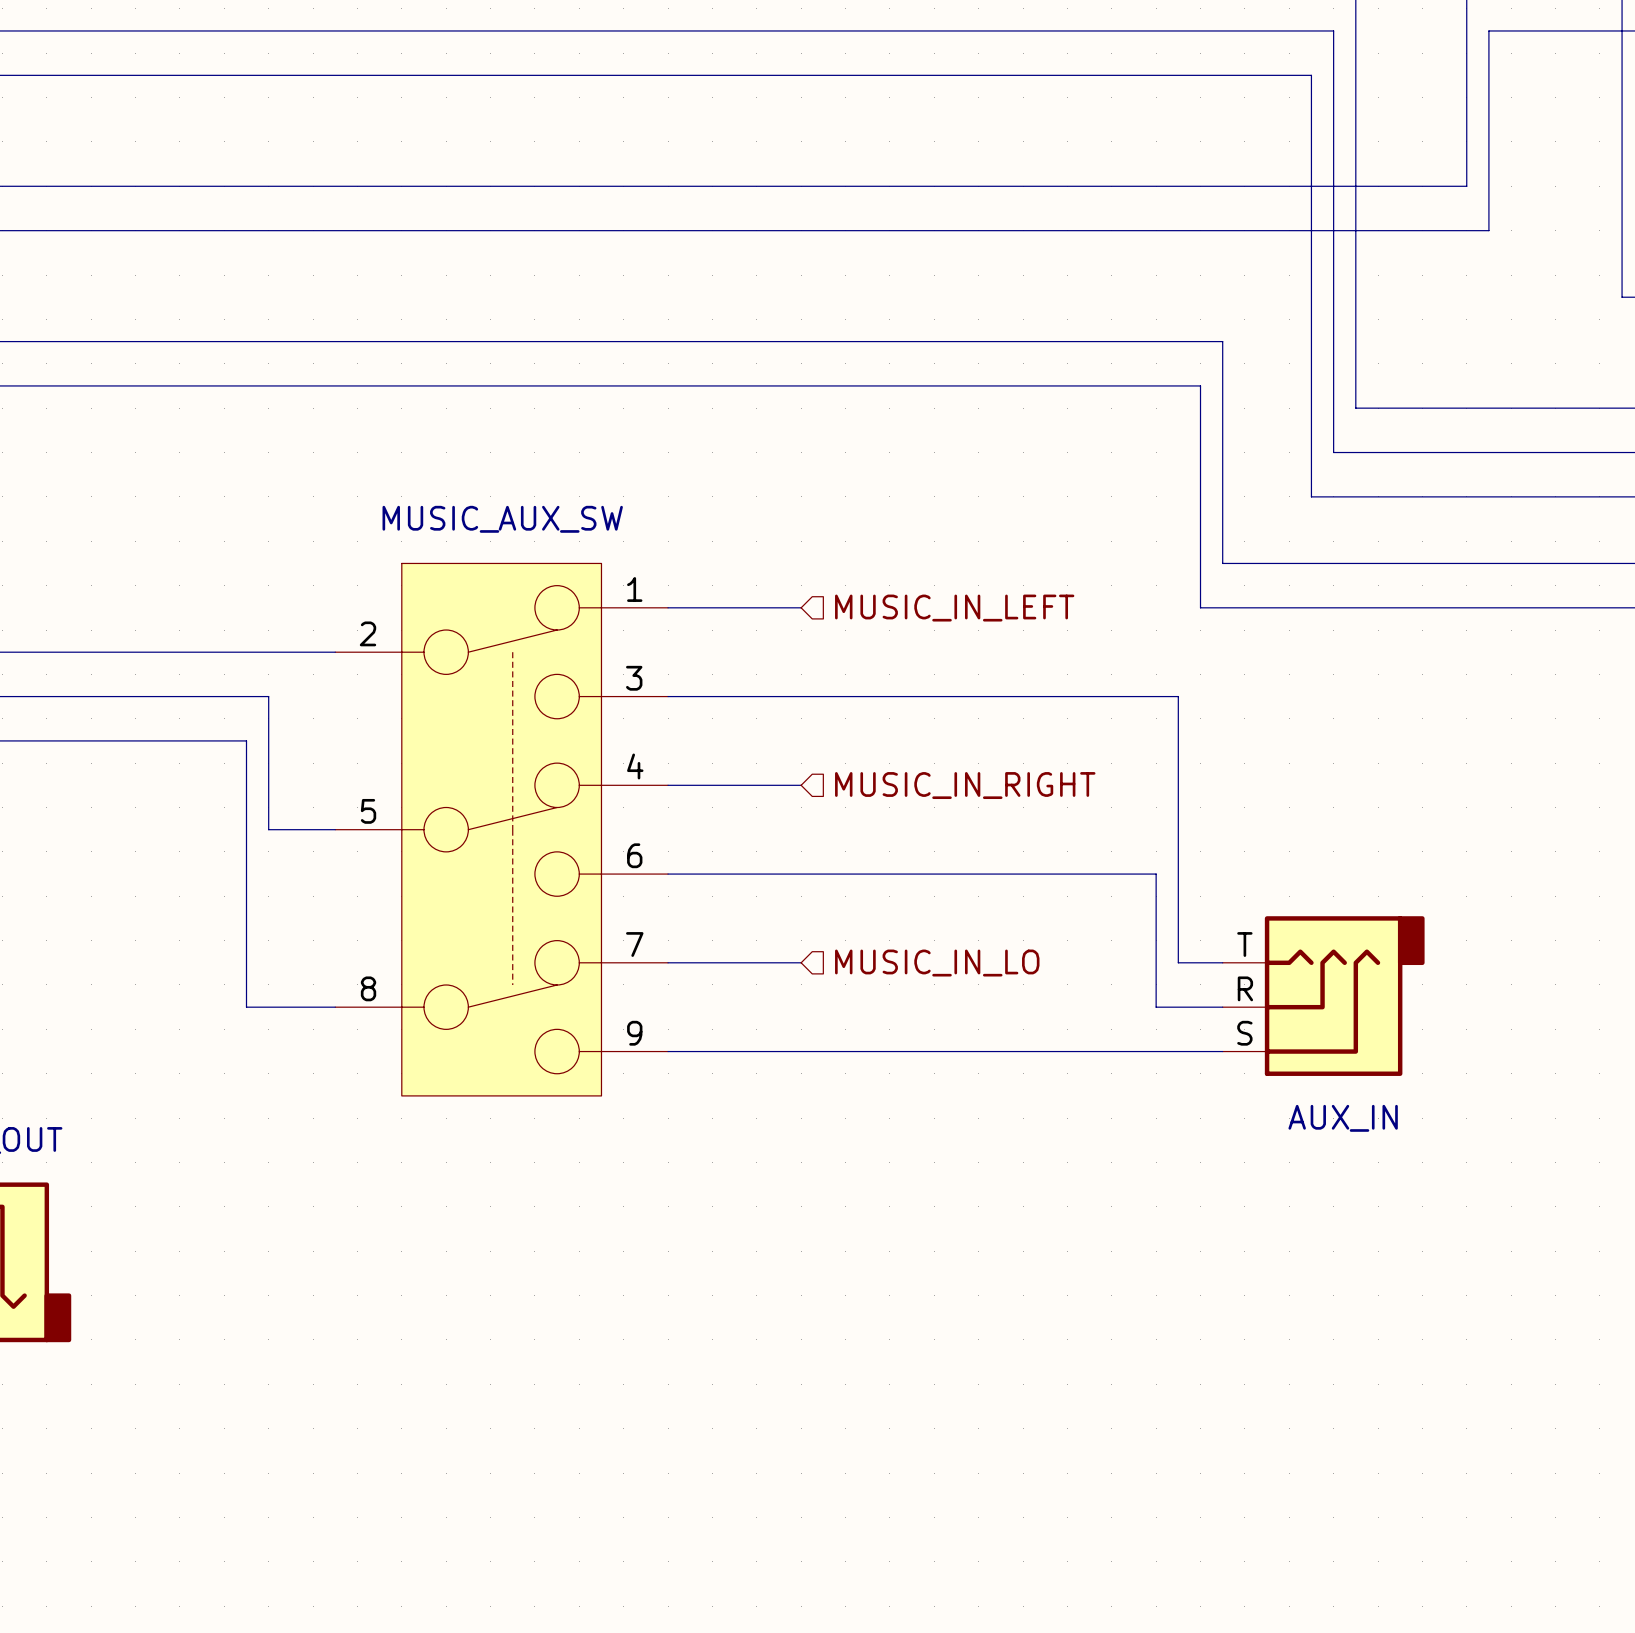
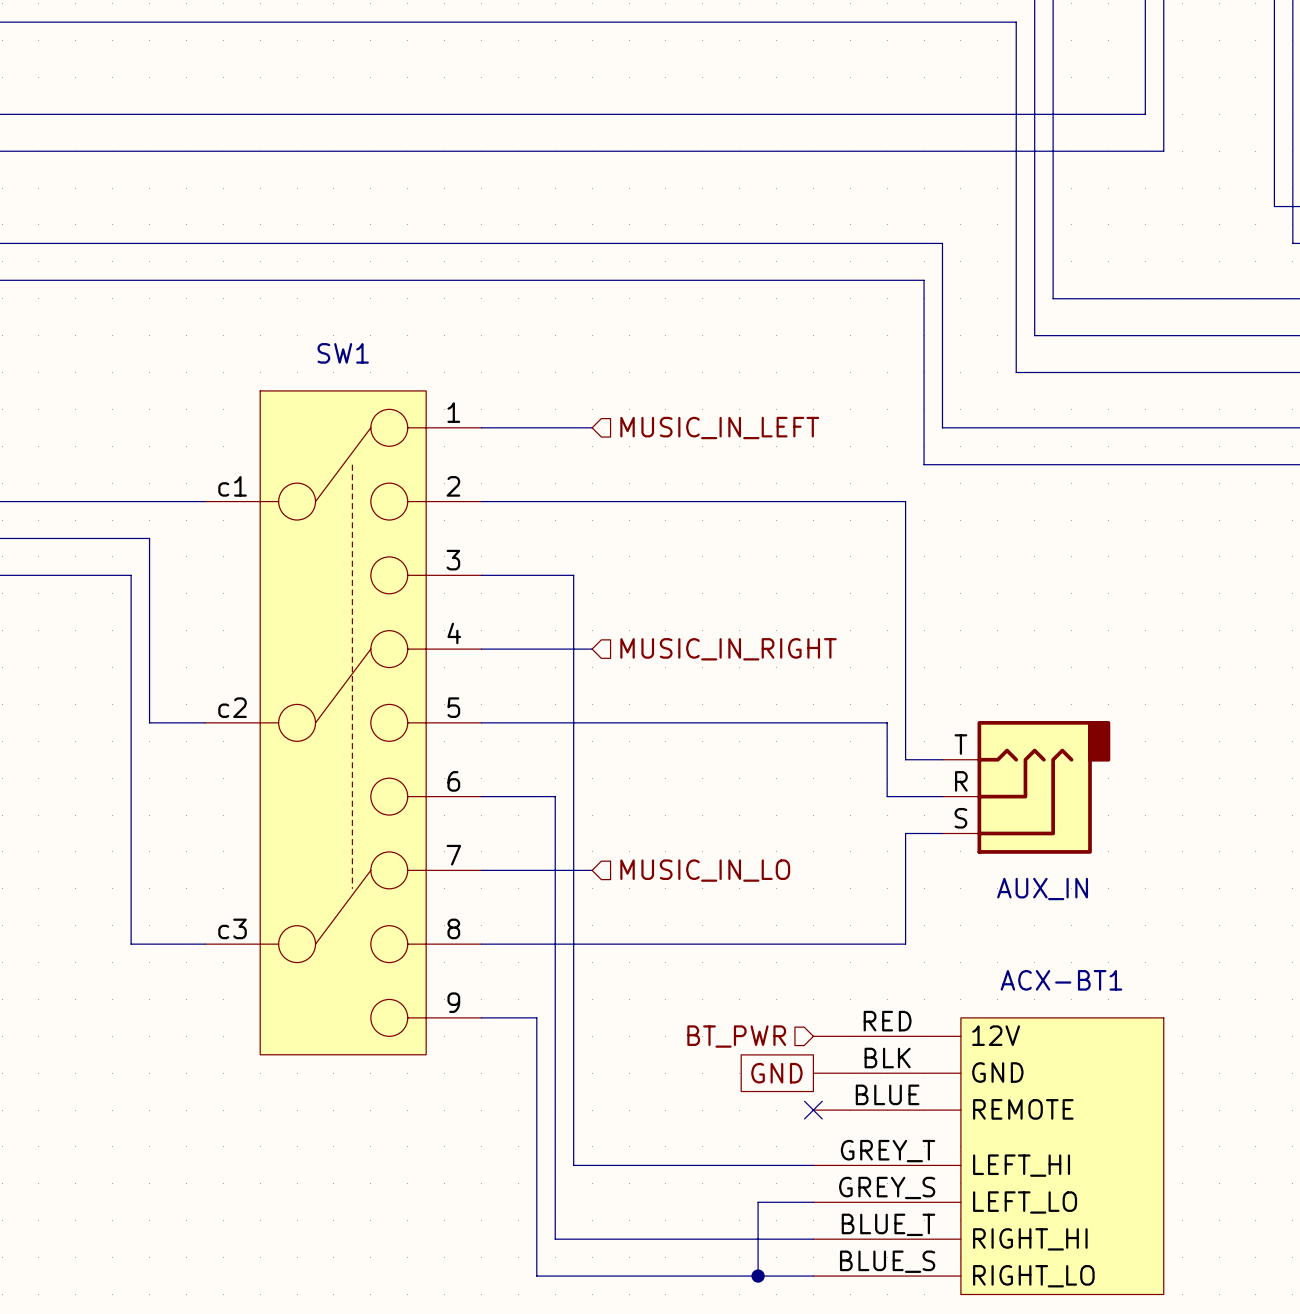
wire: (668, 607) (801, 607) -> (481, 427) (592, 427)
hierarchical label position: MUSIC_IN_LEFT (954, 608) -> MUSIC_IN_LEFT (719, 428)
wire: (668, 696) (1178, 696) -> (481, 501) (905, 501) (905, 538)
wire: none -> (481, 575) (573, 575) (573, 1165) (813, 1165)
wire: (668, 785) (801, 785) -> (481, 649) (592, 649)
hierarchical label position: MUSIC_IN_RIGHT (965, 785) -> MUSIC_IN_RIGHT (728, 649)
wire: (268, 829) (335, 829) -> (149, 649) (149, 722) (204, 722)
MUSIC_AUX_SW: (501, 829) -> none
wire: (668, 874) (1156, 874) (1156, 918) -> (481, 722) (887, 722)
SW1: none -> (343, 722)
wire: (668, 962) (801, 962) -> (481, 870) (592, 870)
hierarchical label position: MUSIC_IN_LO (937, 963) -> MUSIC_IN_LO (705, 870)
wire: (246, 1007) (335, 1007) -> (131, 796) (131, 944) (204, 944)
wire: none -> (481, 796) (555, 796) (555, 1239) (813, 1239)
wire: (668, 1051) (1178, 1051) -> (481, 944) (905, 944) (905, 833)
wire: none -> (481, 1017) (536, 1017) (536, 1276) (813, 1276)
hierarchical label: none -> BT_PWR (736, 1036)
global label: none -> GND (776, 1073)
no-connect mark: none -> (813, 1110)
ACX-BT1: none -> (988, 1156)
wire: none -> (813, 1202) (758, 1202) (758, 1276)
junction: none -> (758, 1276)

